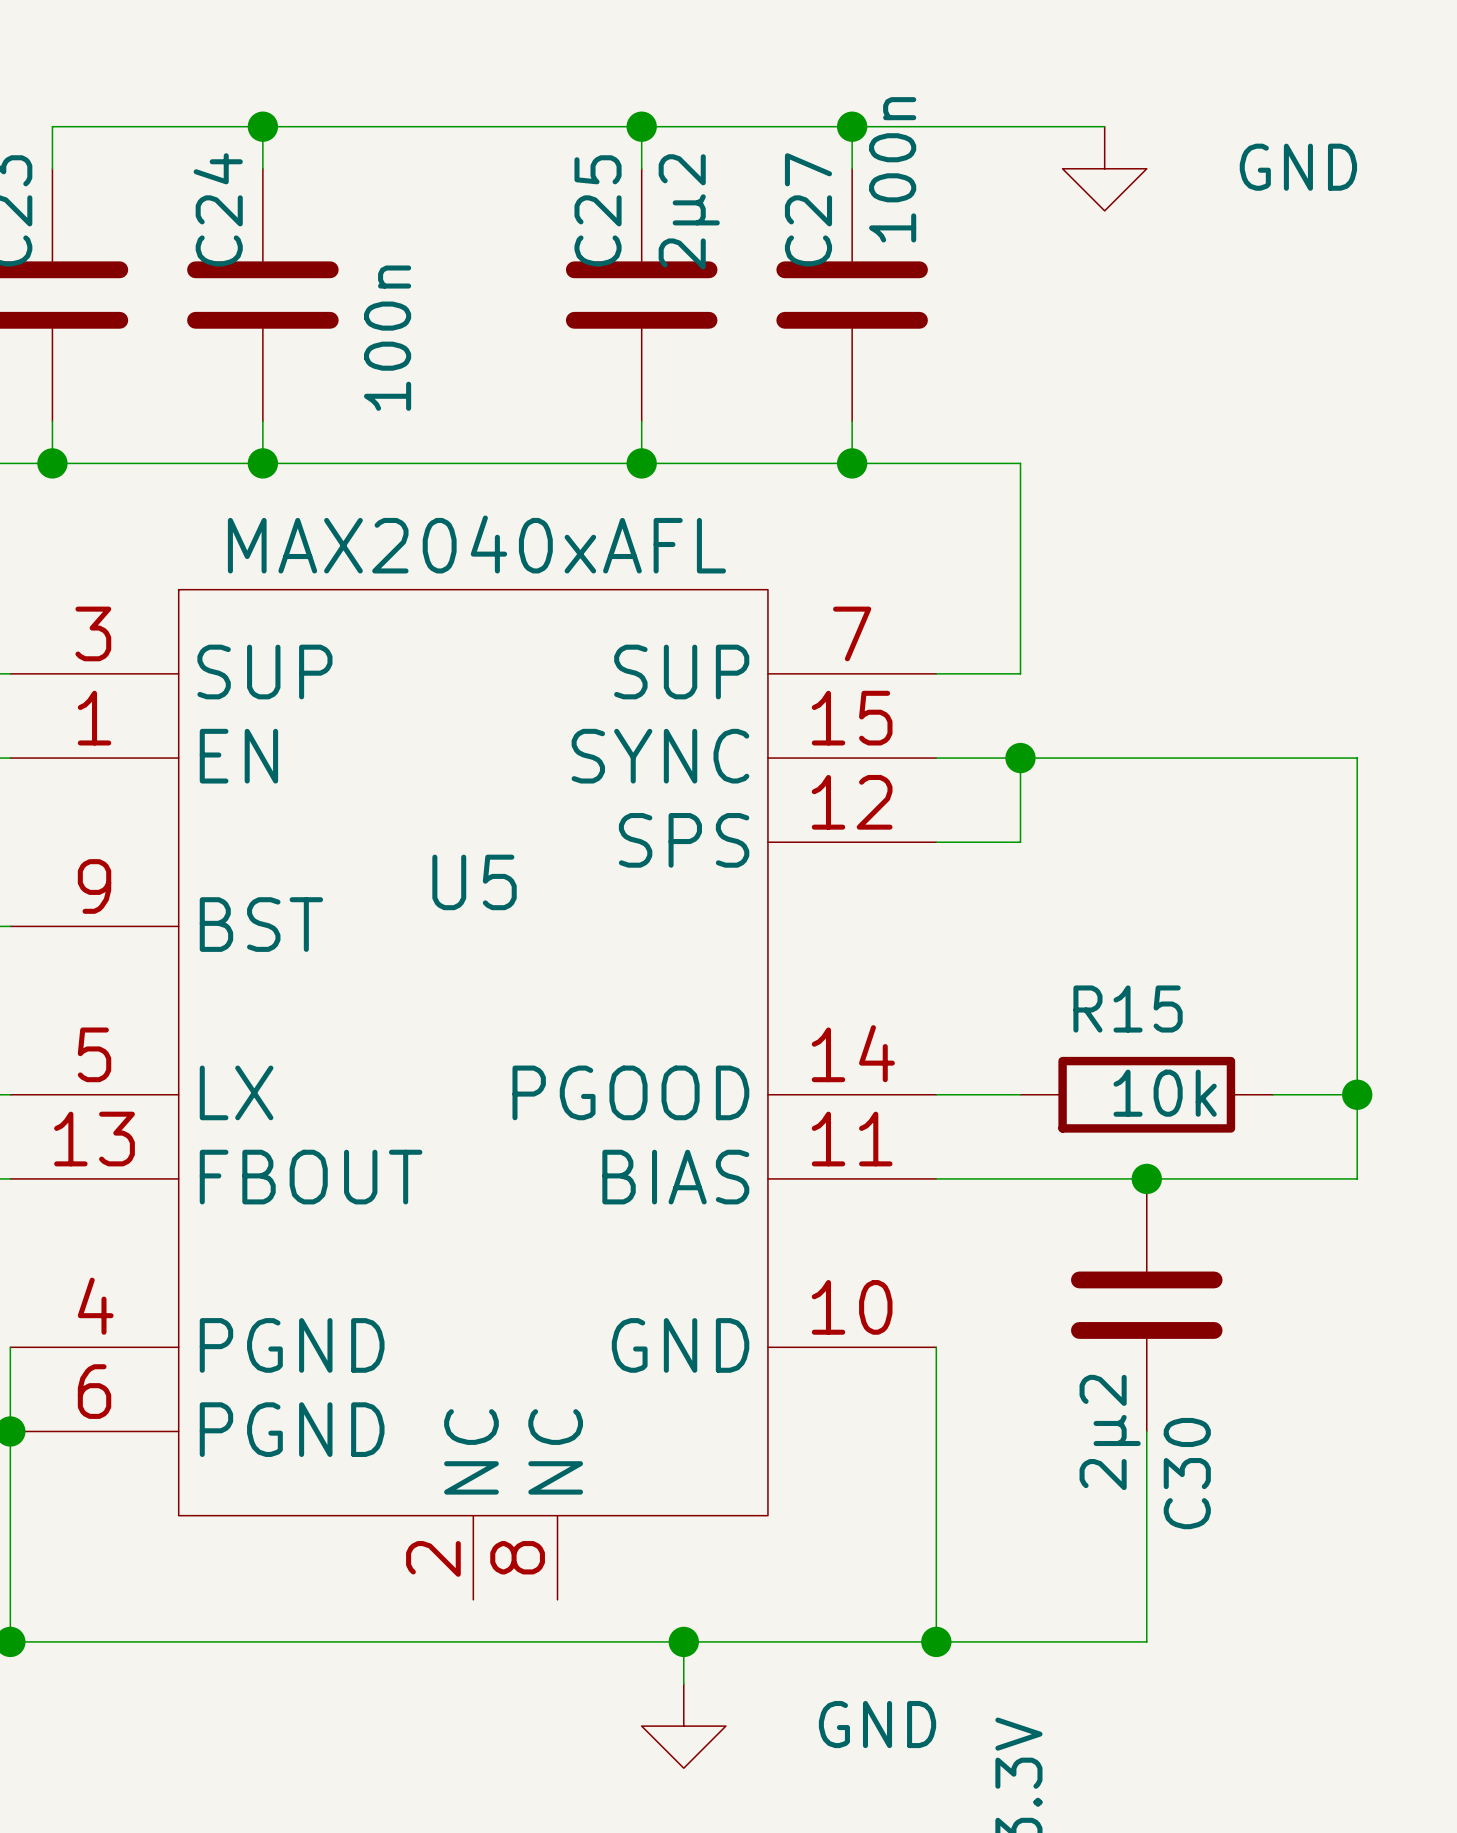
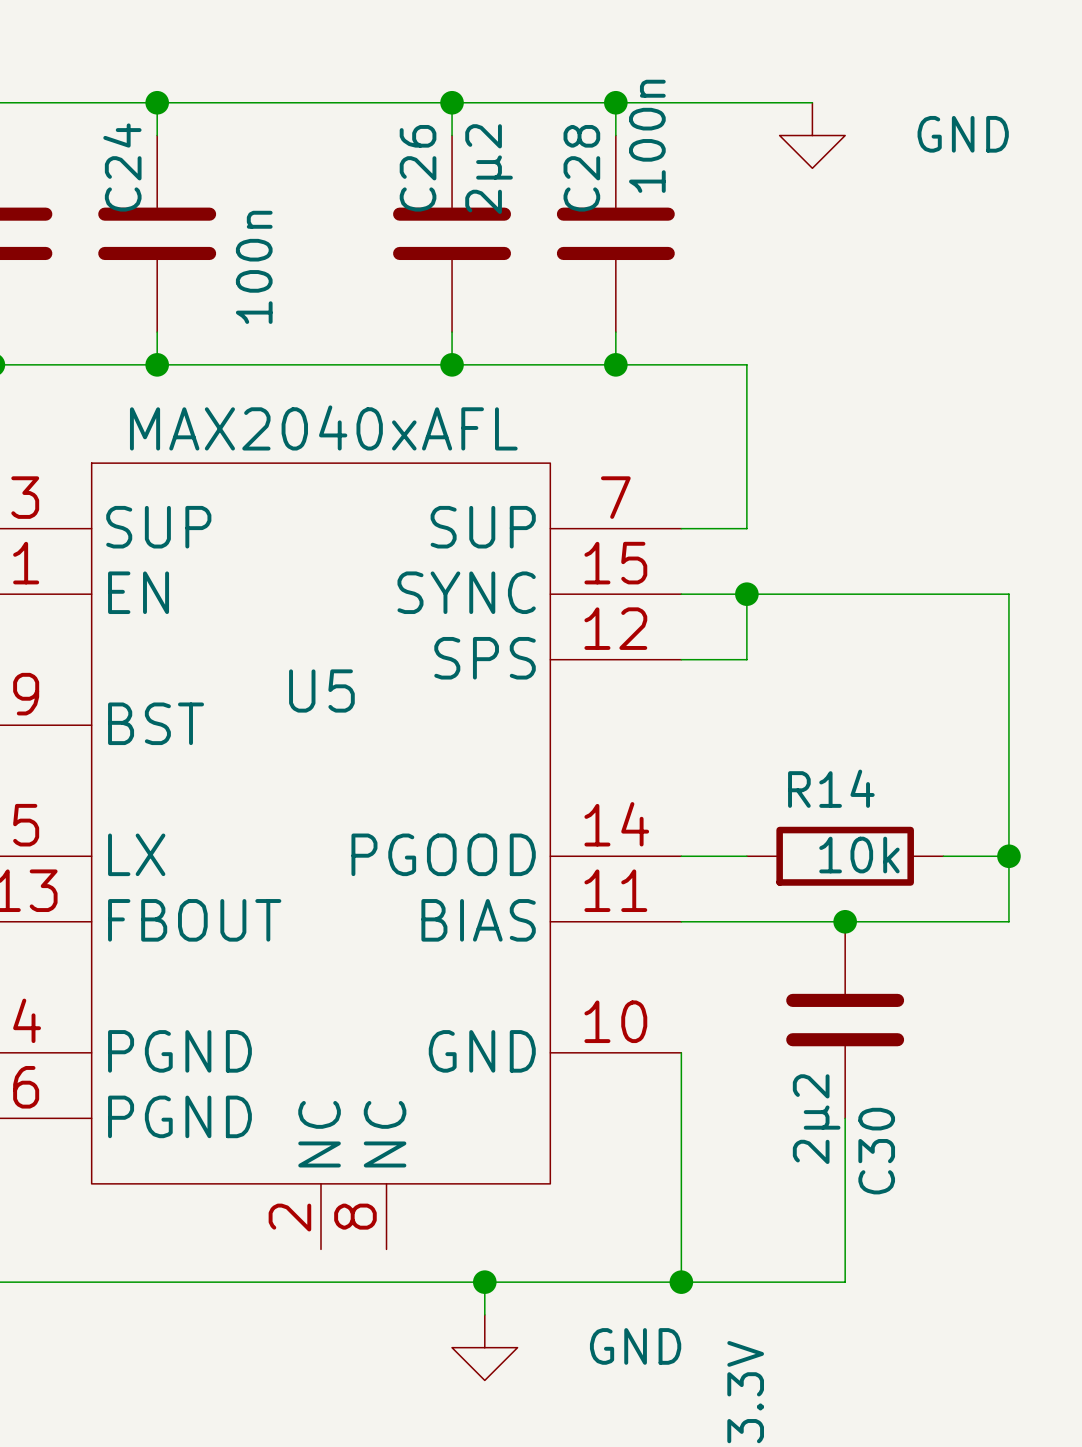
C27 name: C27 (808, 209) -> C28 (581, 168)
C25 name: C25 (598, 210) -> C26 (418, 168)
R15 name: R15 (1128, 1009) -> R14 (831, 788)

